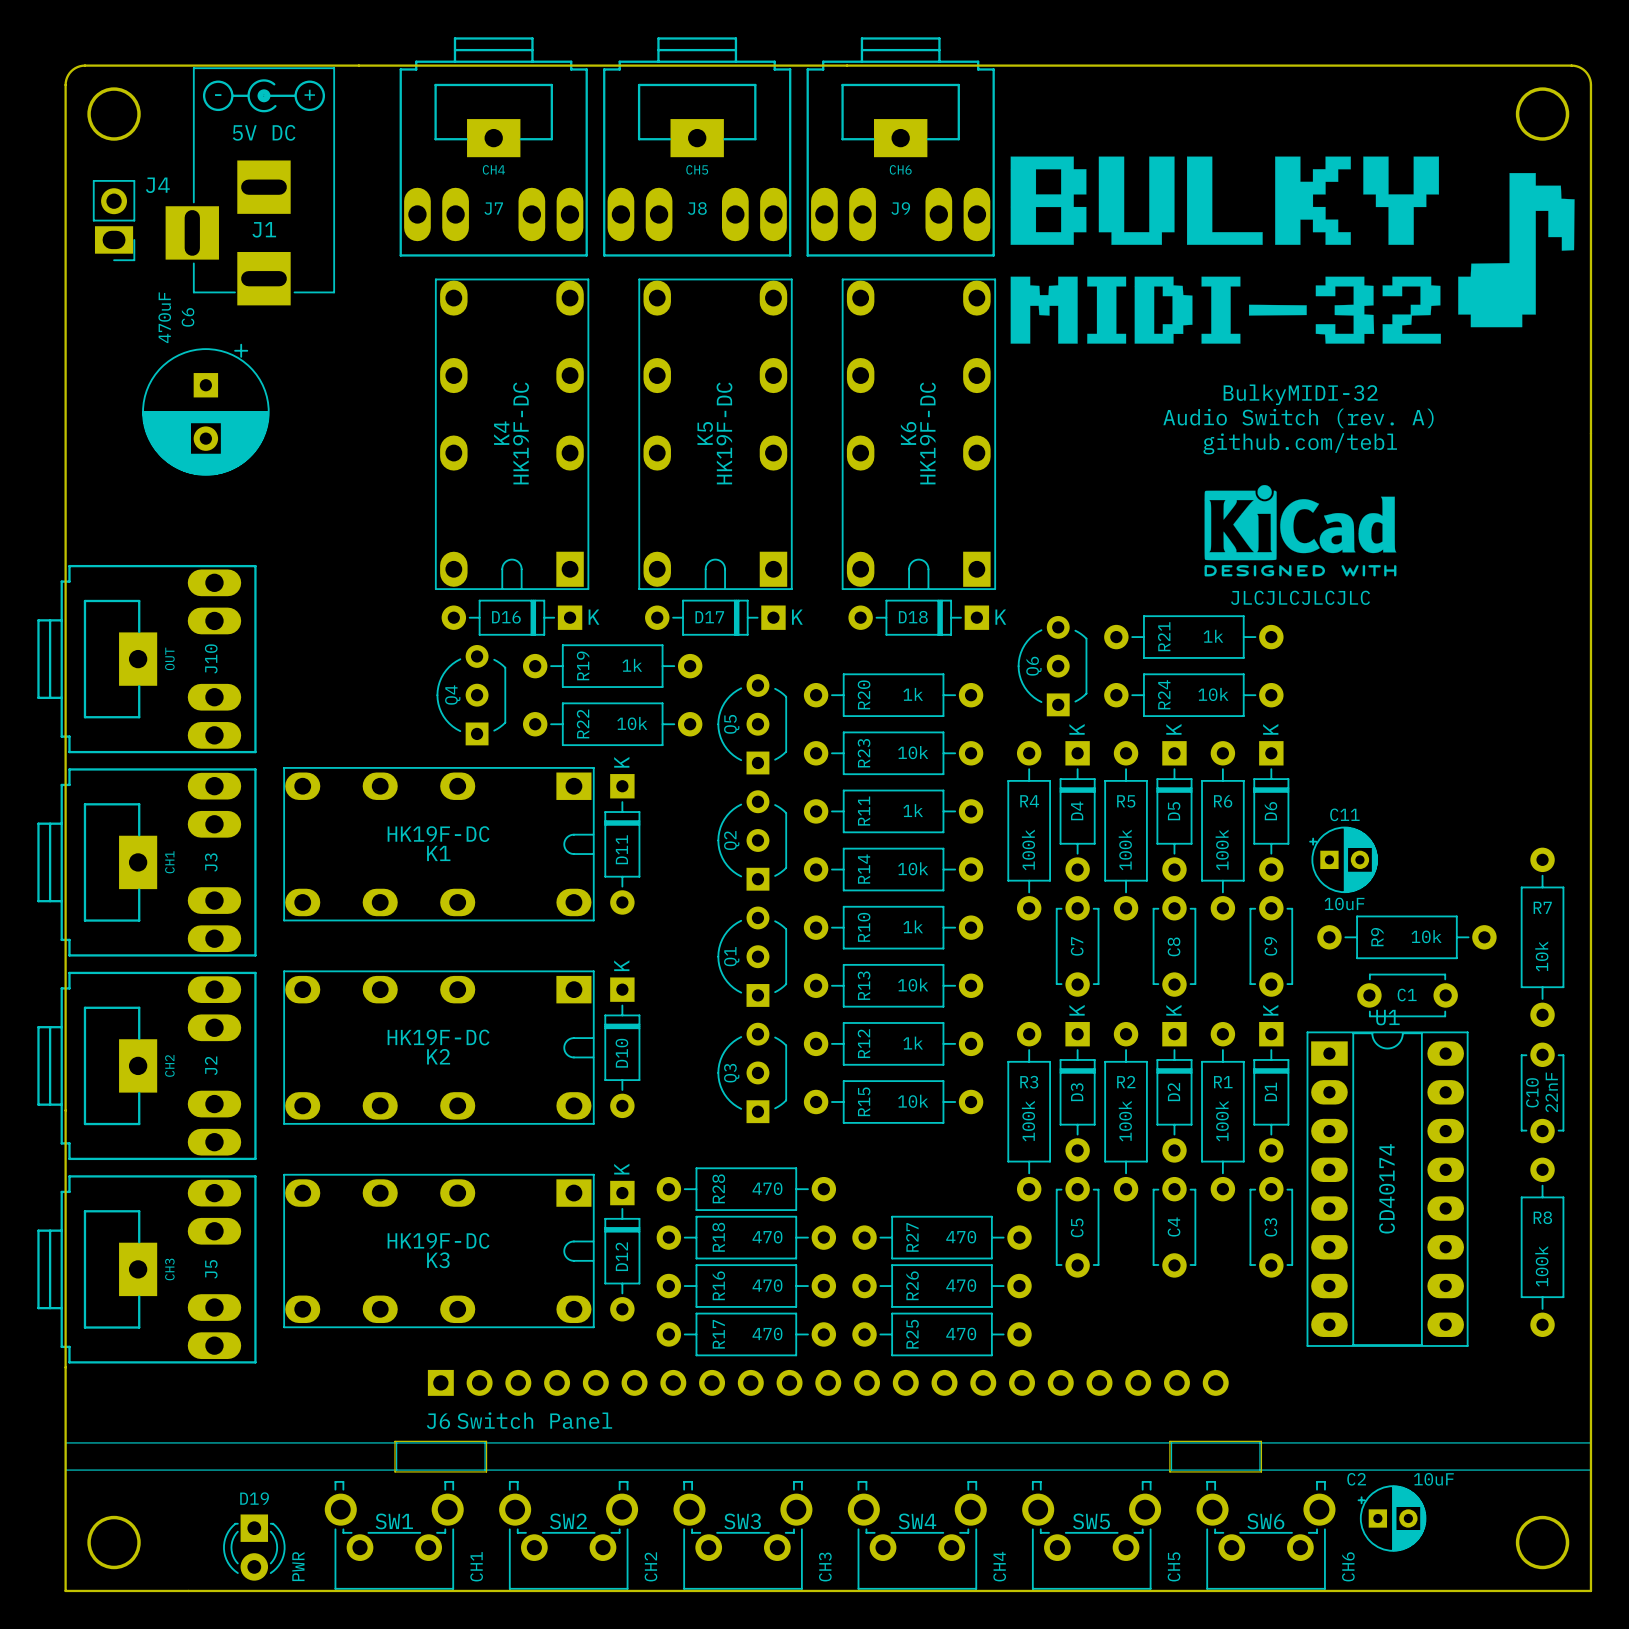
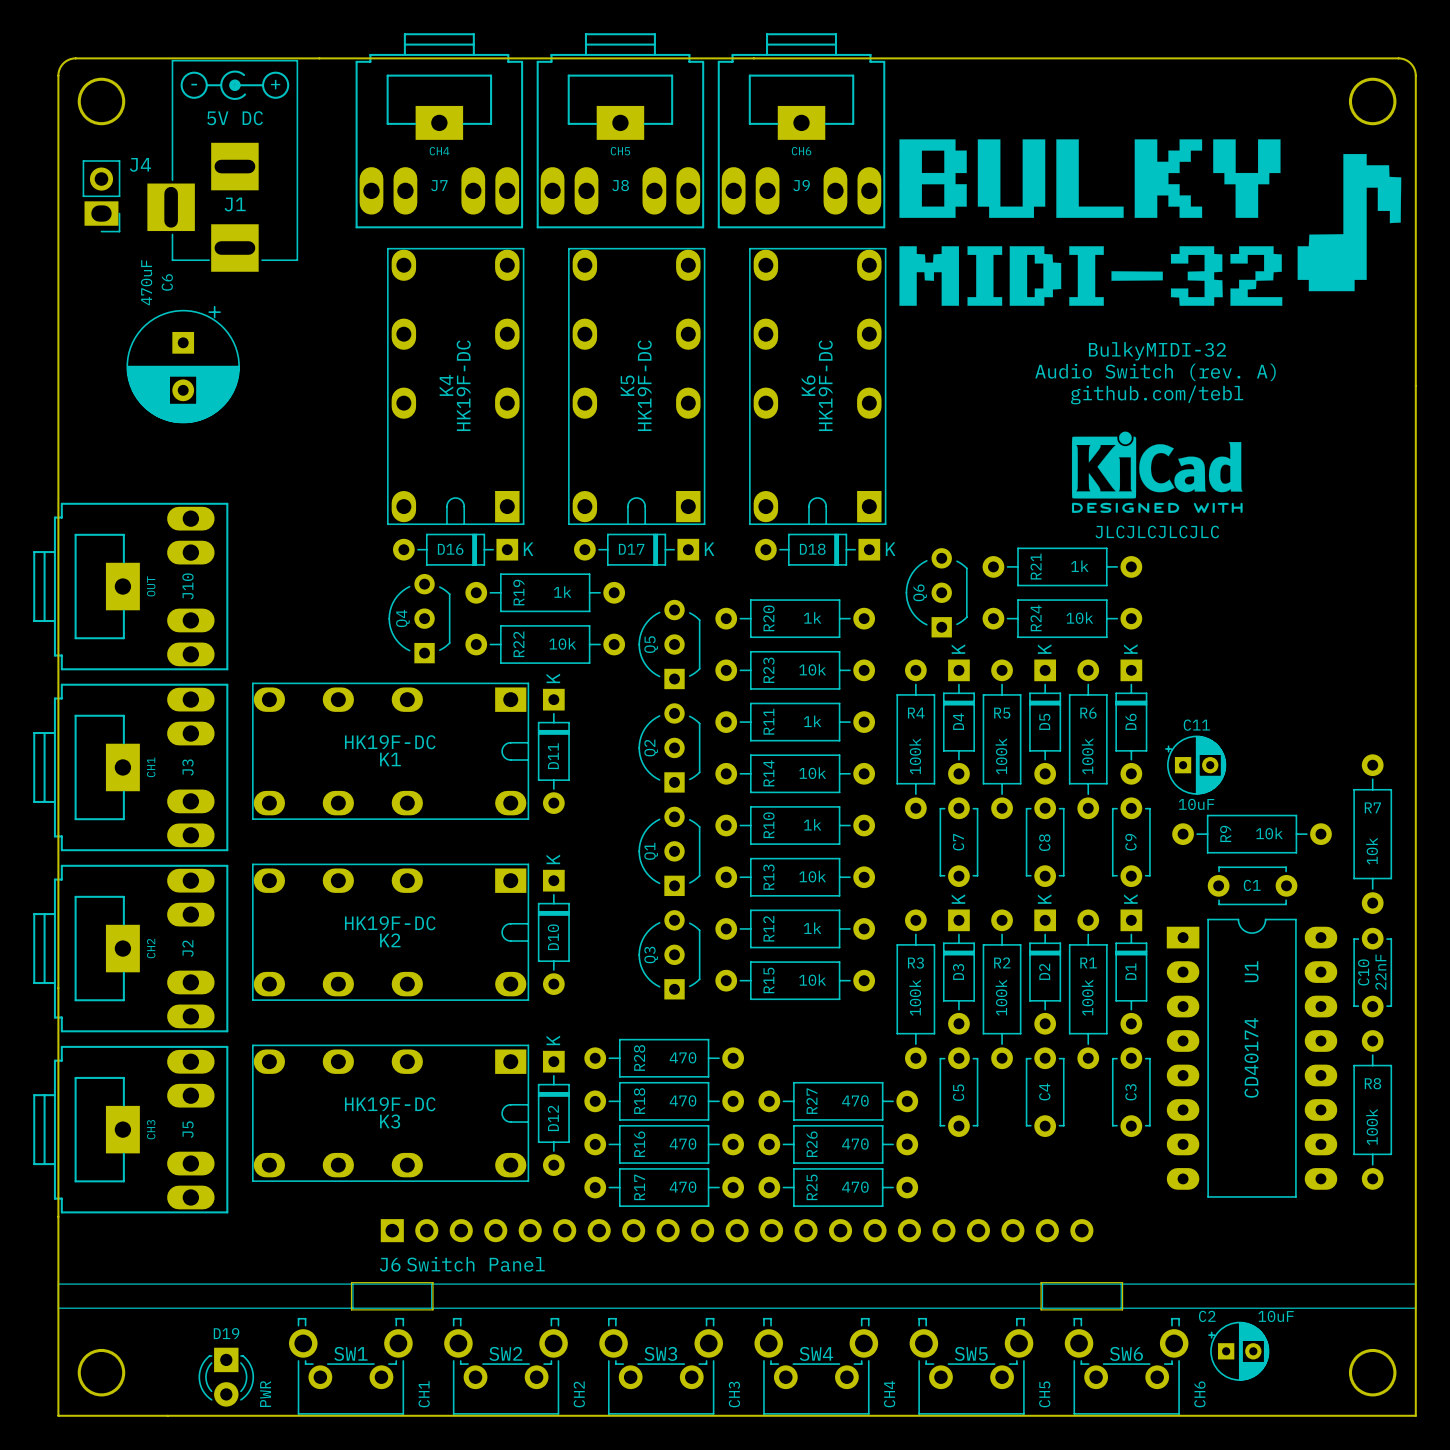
U1 name position: U1 (1387, 1017) -> U1 (1251, 971)
U1 footprint: [1306, 1031, 1469, 1347] -> [1166, 918, 1338, 1198]

